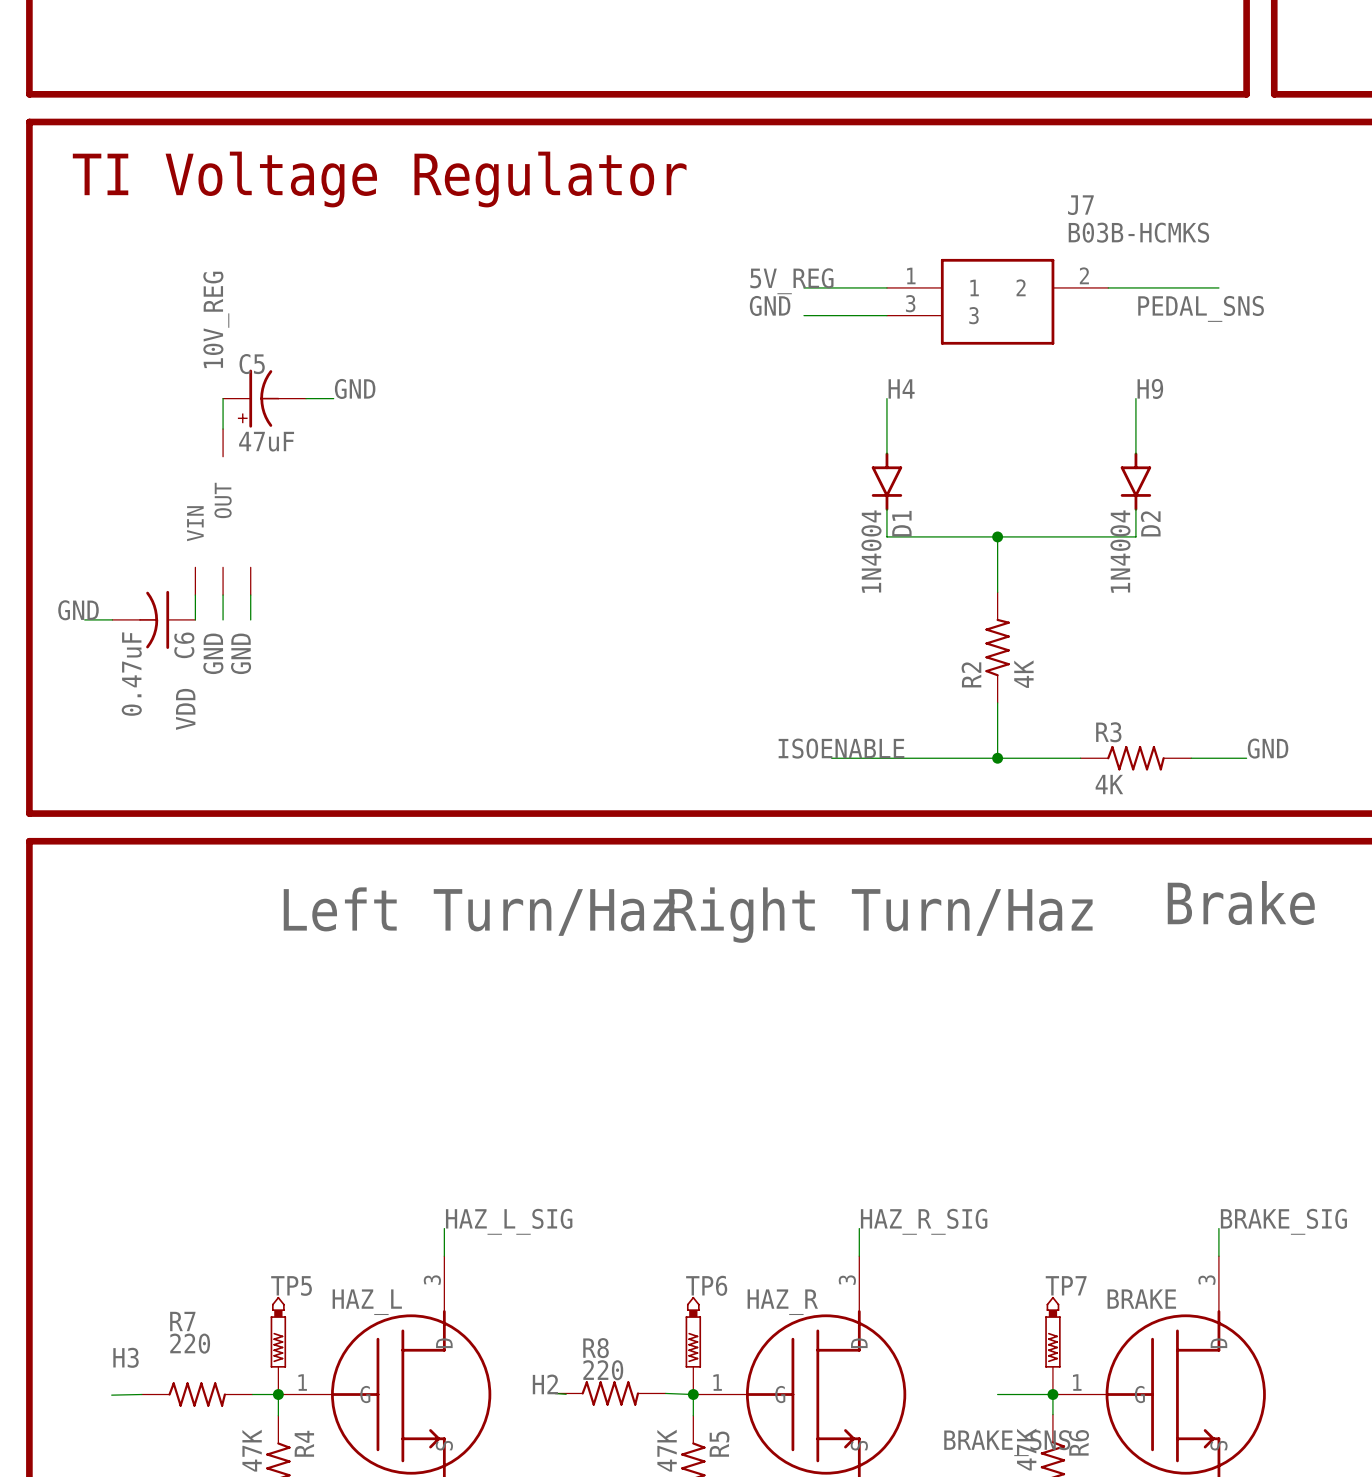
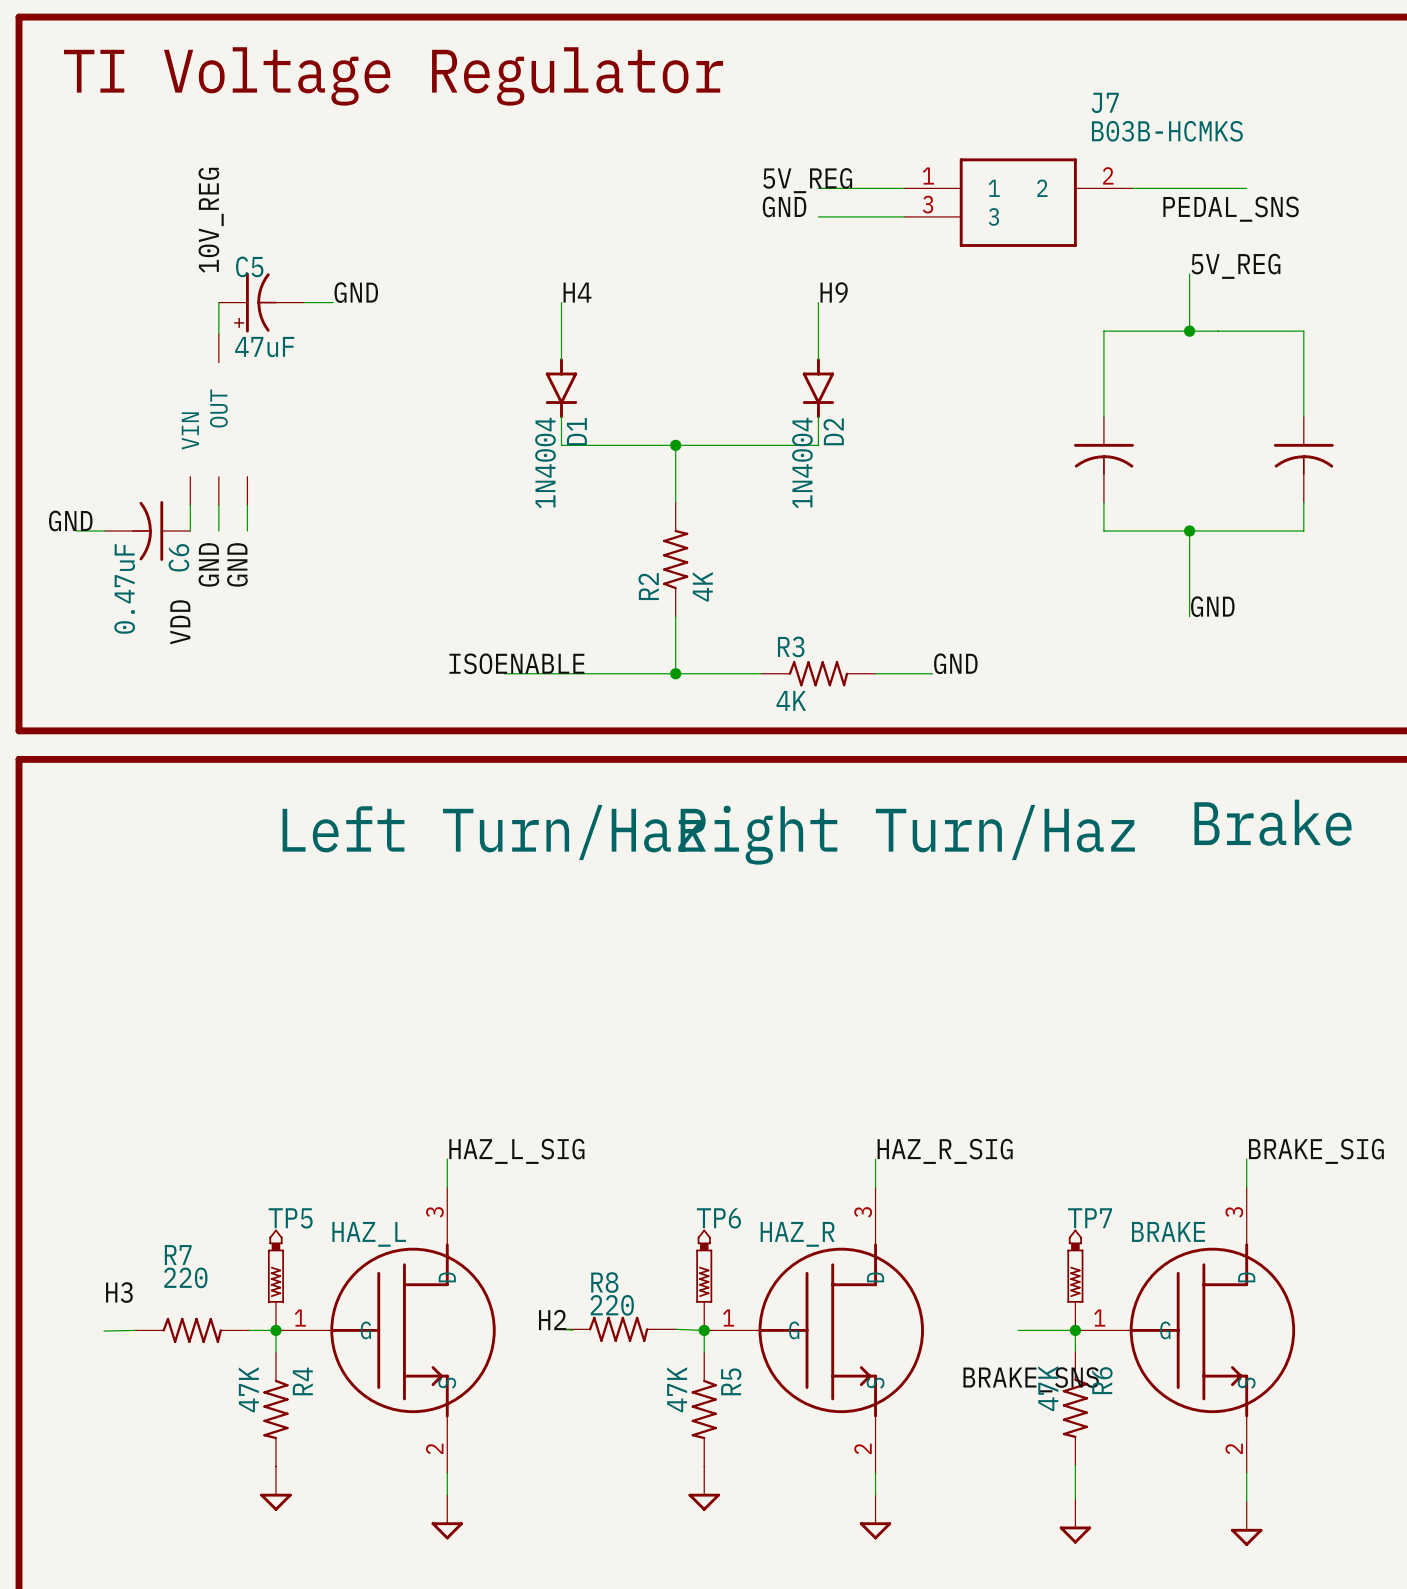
label: none -> 5V_REG (1235, 266)
label: none -> H4 (577, 292)
label: none -> H9 (834, 292)
label: H4 (901, 388) -> none
label: H9 (1150, 388) -> none
wire: none -> (561, 302) (561, 359)
wire: (886, 398) (886, 453) -> (818, 302) (818, 359)
wire: (1135, 398) (1135, 453) -> (1189, 274) (1189, 331)
junction: none -> (1189, 331)
D1 position: (886, 481) -> (561, 388)
D2 position: (1135, 481) -> (818, 388)
wire: none -> (561, 416) (561, 445) (818, 445) (818, 416)
wire: (886, 509) (886, 536) (1135, 536) (1135, 509) -> none
wire: none -> (1103, 416) (1103, 331) (1303, 331) (1303, 416)
wire: none -> (675, 445) (675, 502)
junction: none -> (675, 445)
wire: (997, 536) (997, 592) -> none
junction: (997, 536) -> none
part: none -> (1103, 459)
part: none -> (1303, 459)
wire: none -> (1103, 502) (1103, 531) (1303, 531) (1303, 502)
wire: none -> (1189, 531) (1189, 616)
junction: none -> (1189, 531)
R2 position: (997, 647) -> (675, 559)
wire: none -> (675, 616) (675, 673)
wire: (997, 702) (997, 758) -> none
label: none -> ISOENABLE (516, 663)
label: ISOENABLE (841, 748) -> none
label: none -> GND (955, 663)
label position: GND (1268, 748) -> GND (1212, 606)
wire: none -> (504, 673) (761, 673)
junction: none -> (675, 673)
wire: (914, 758) (1080, 758) -> none
junction: (997, 758) -> none
R3 position: (1135, 758) -> (818, 673)
wire: (1191, 758) (1246, 758) -> none

